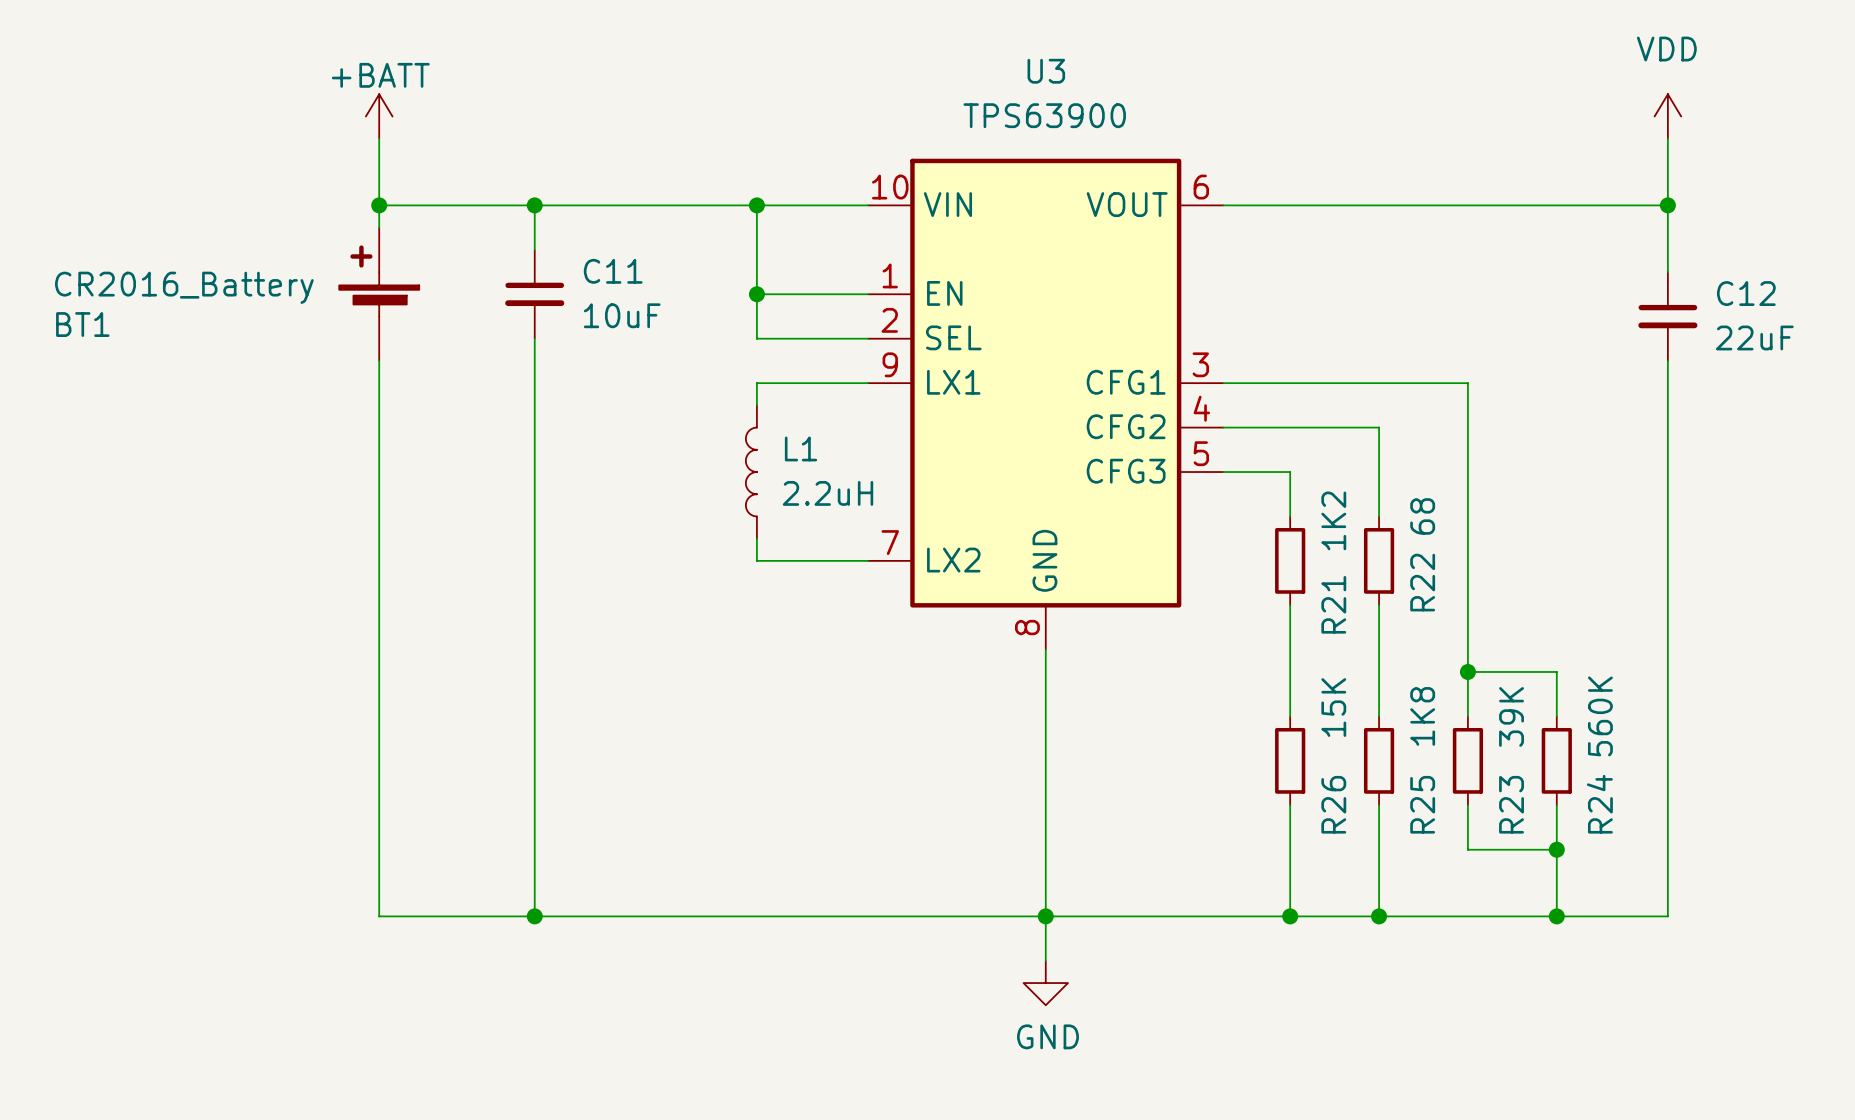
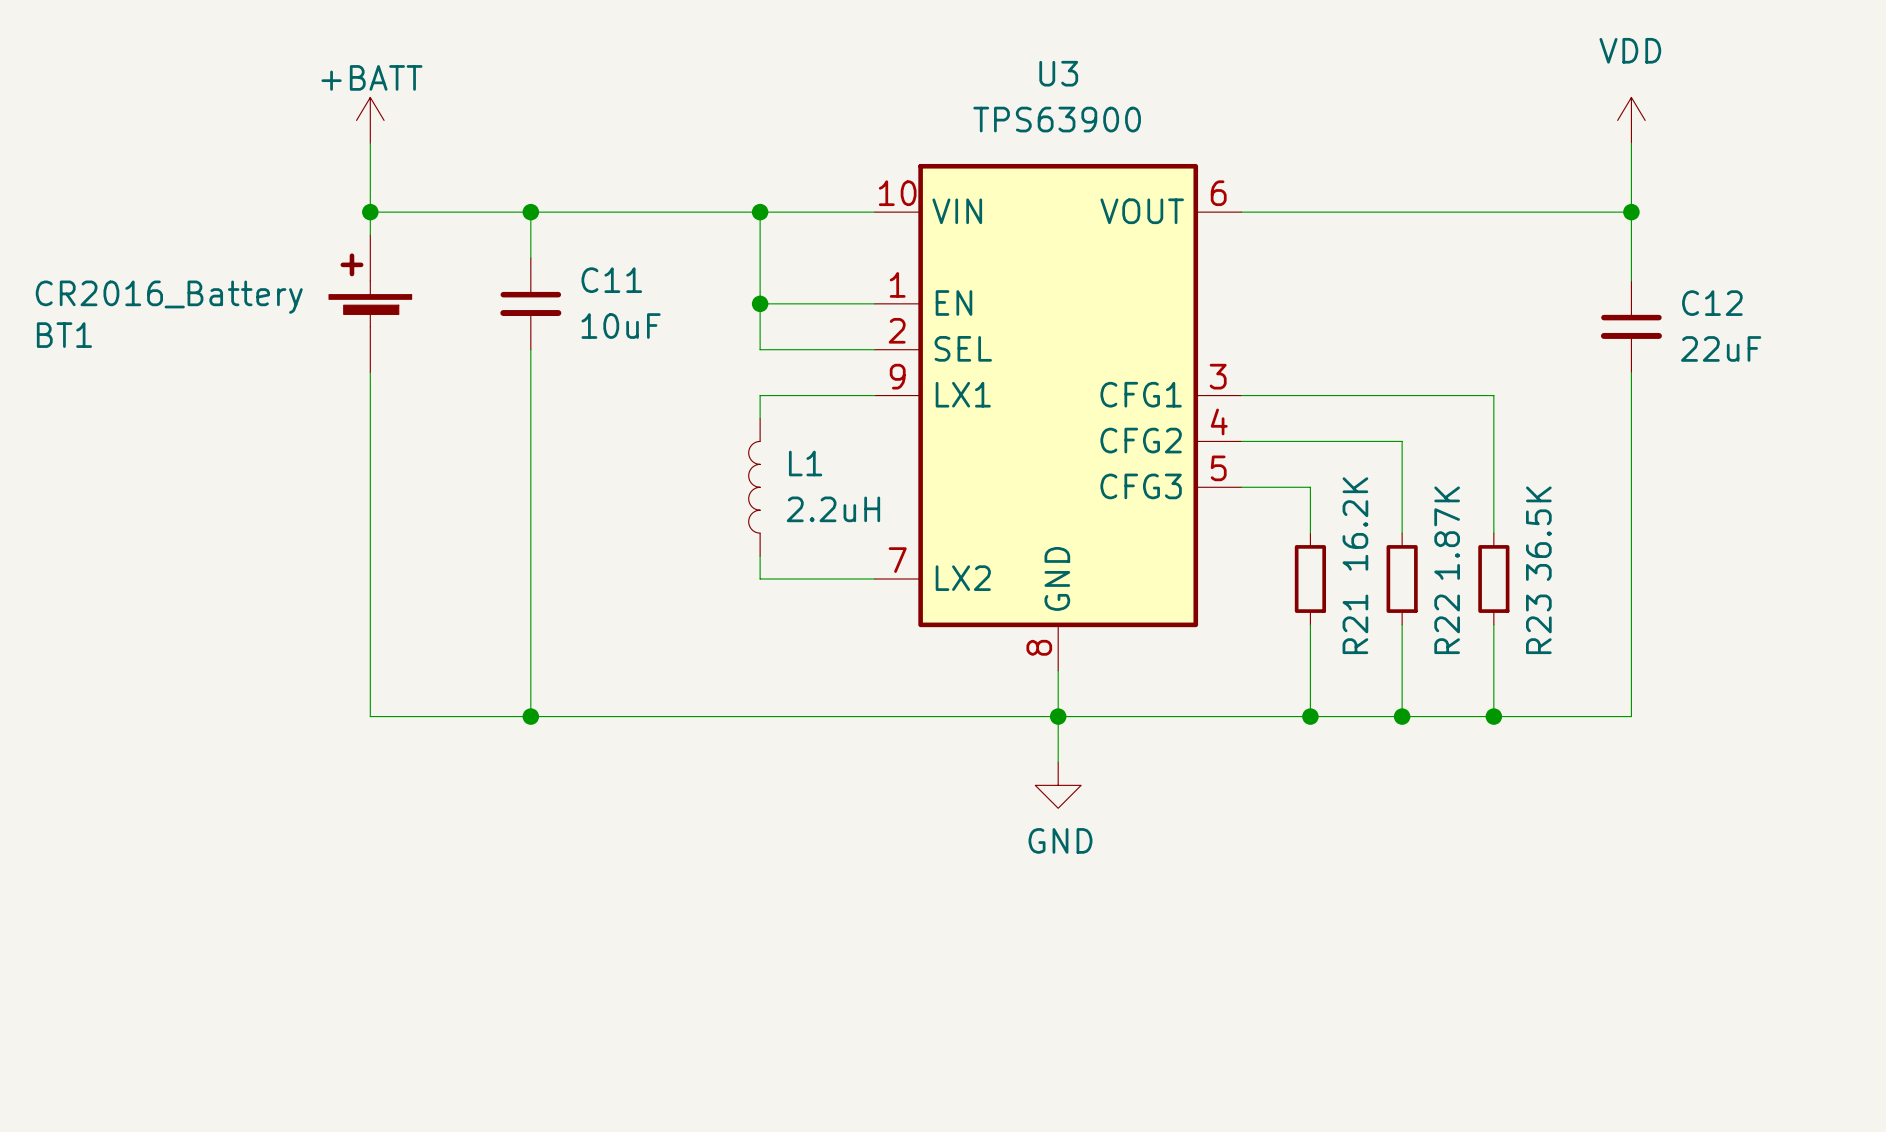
power symbol position: VDD (1667, 116) -> VDD (1631, 120)
wire: (1667, 138) (1667, 272) -> (1631, 143) (1631, 280)
wire: (1601, 205) (1667, 205) -> none
junction position: (1667, 205) -> (1631, 212)
C12 position: (1667, 316) -> (1631, 326)
wire: (1667, 360) (1667, 916) (379, 916) (379, 694) -> (1631, 372) (1631, 716) (370, 716)
R22 value: 68 (1422, 516) -> 1.87K (1447, 533)
wire: (1467, 516) (1467, 605) -> none
R21 value: 1K2 (1333, 520) -> 16.2K (1355, 523)
R22 name position: R22 (1422, 582) -> R22 (1447, 624)
wire: (1467, 671) (1556, 671) (1556, 716) -> none
junction position: (1467, 671) -> (1493, 716)
wire: (534, 694) (534, 916) -> none
junction: none -> (530, 716)
junction: none -> (1058, 716)
wire: (1290, 694) (1290, 716) -> none
junction: none -> (1310, 716)
wire: (1379, 694) (1379, 716) -> none
junction: none -> (1402, 716)
wire: (1467, 694) (1467, 716) -> none
R23 value: 39K (1511, 716) -> 36.5K (1538, 533)
wire: (1045, 738) (1045, 960) -> none
R26: 15K (1290, 760) -> none
R25: 1K8 (1379, 760) -> none
R23 position: (1467, 760) -> (1493, 579)
R24: 560K (1556, 760) -> none
wire: (1290, 805) (1290, 916) -> none
wire: (1379, 805) (1379, 916) -> none
wire: (1467, 805) (1467, 849) (1556, 849) -> none
wire: (1556, 805) (1556, 916) -> none
junction: (1556, 849) -> none
junction: (534, 916) -> none
junction: (1045, 916) -> none
junction: (1290, 916) -> none
junction: (1379, 916) -> none
junction: (1556, 916) -> none
power symbol position: GND (1045, 983) -> GND (1058, 785)

